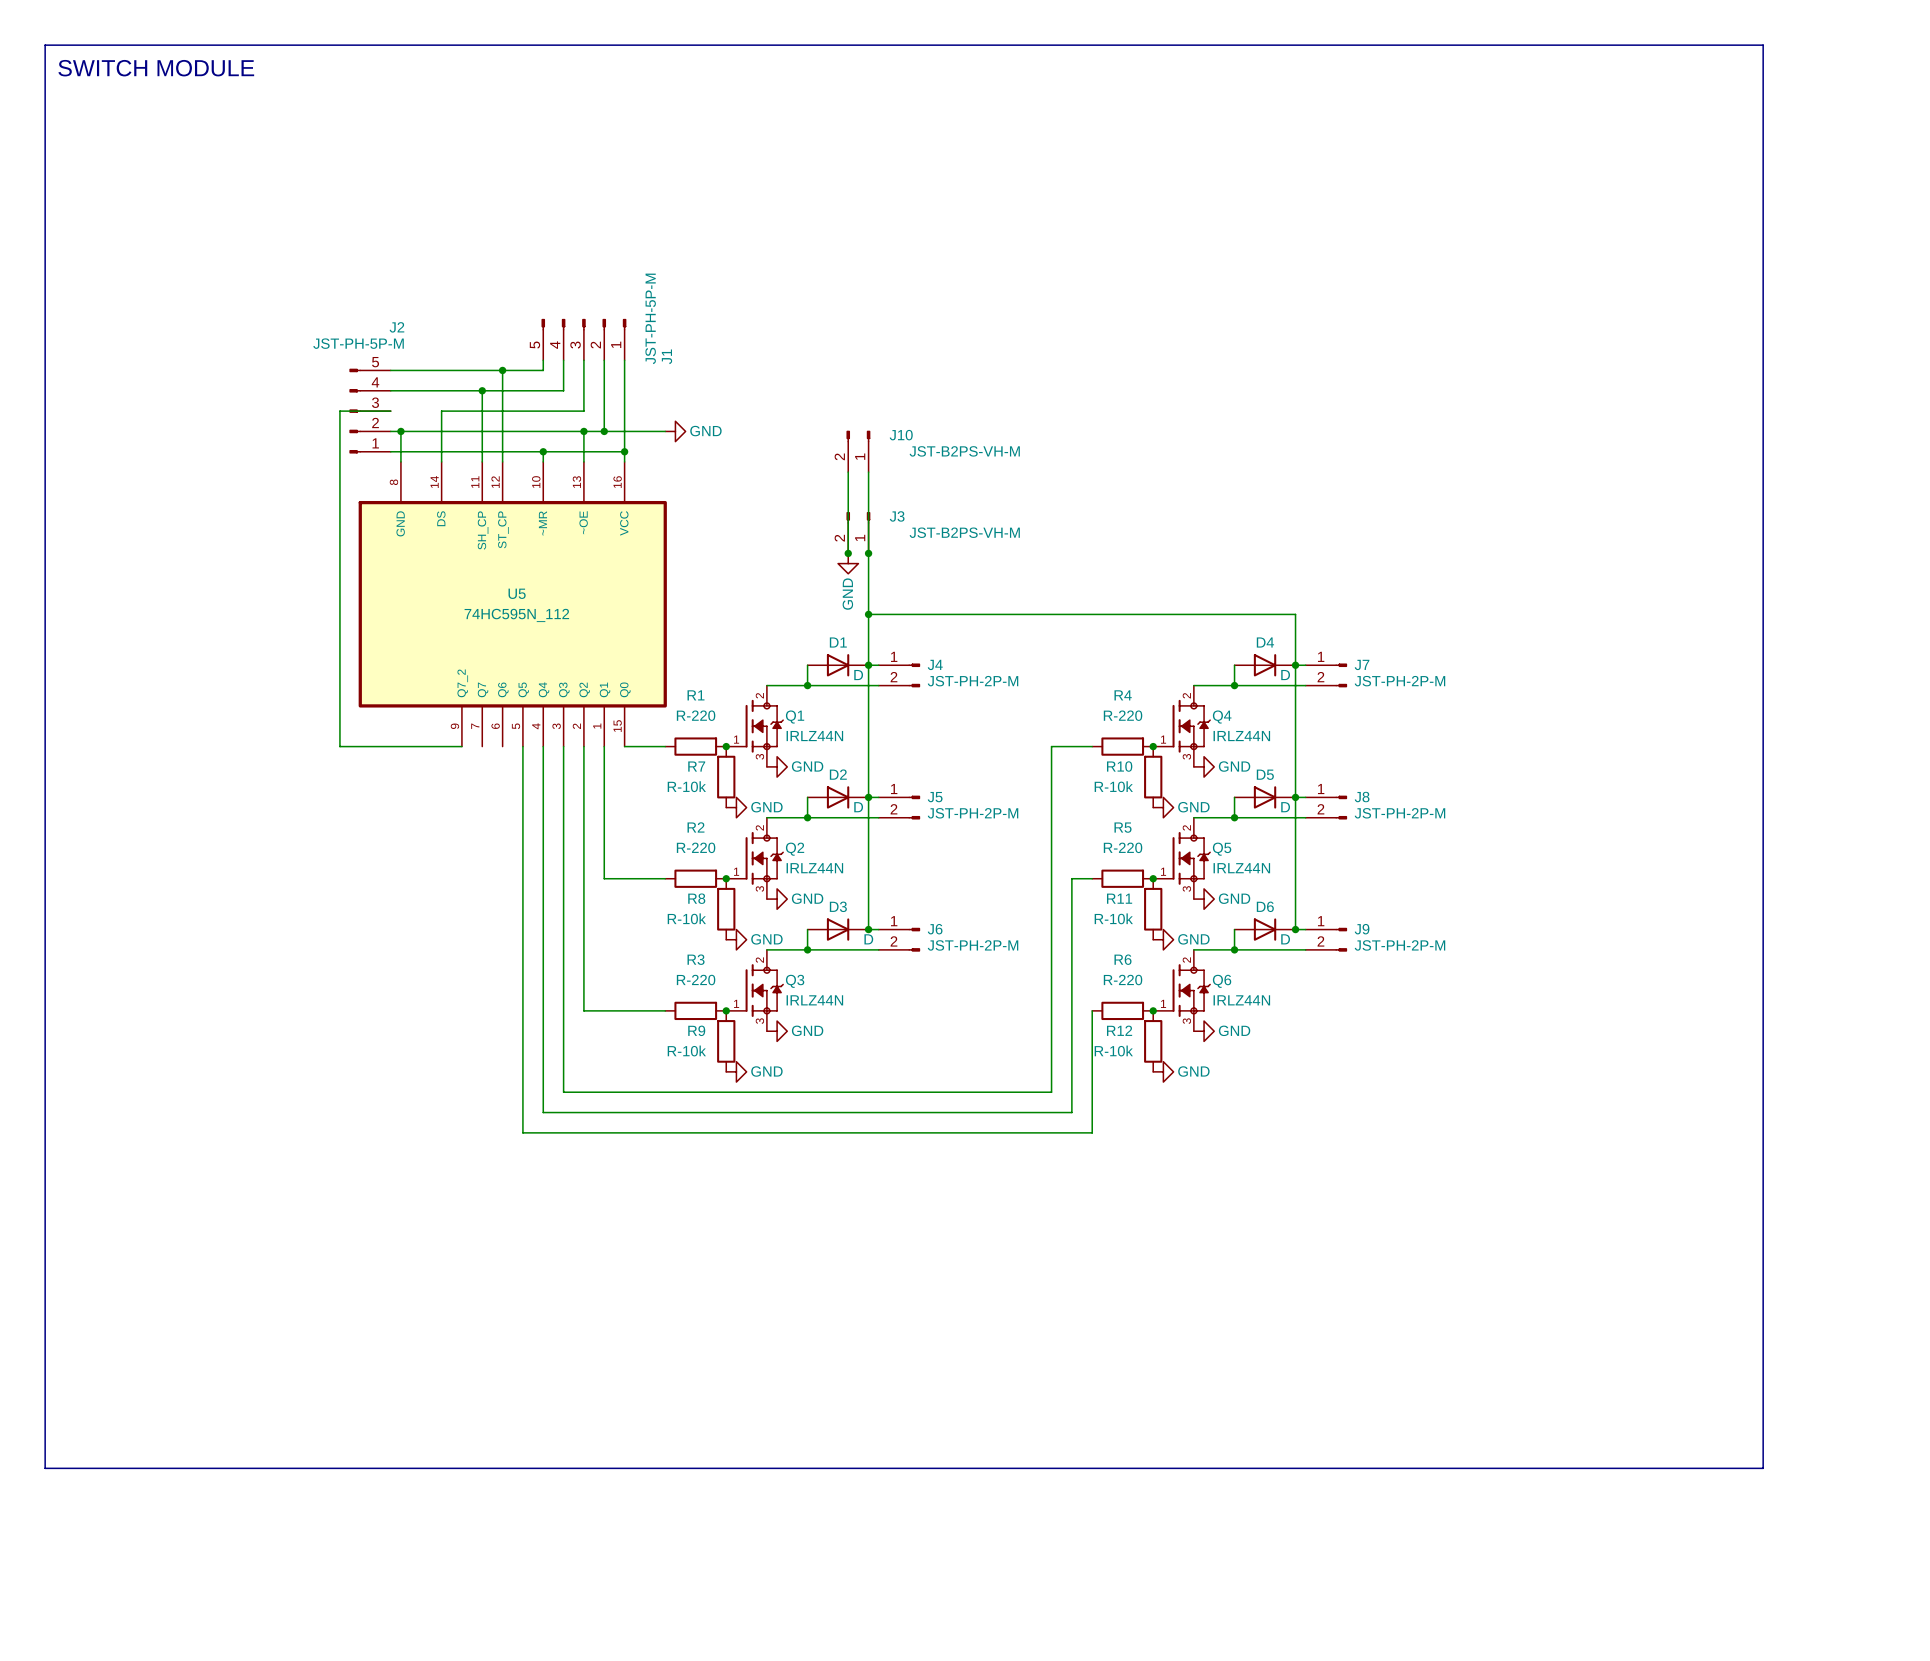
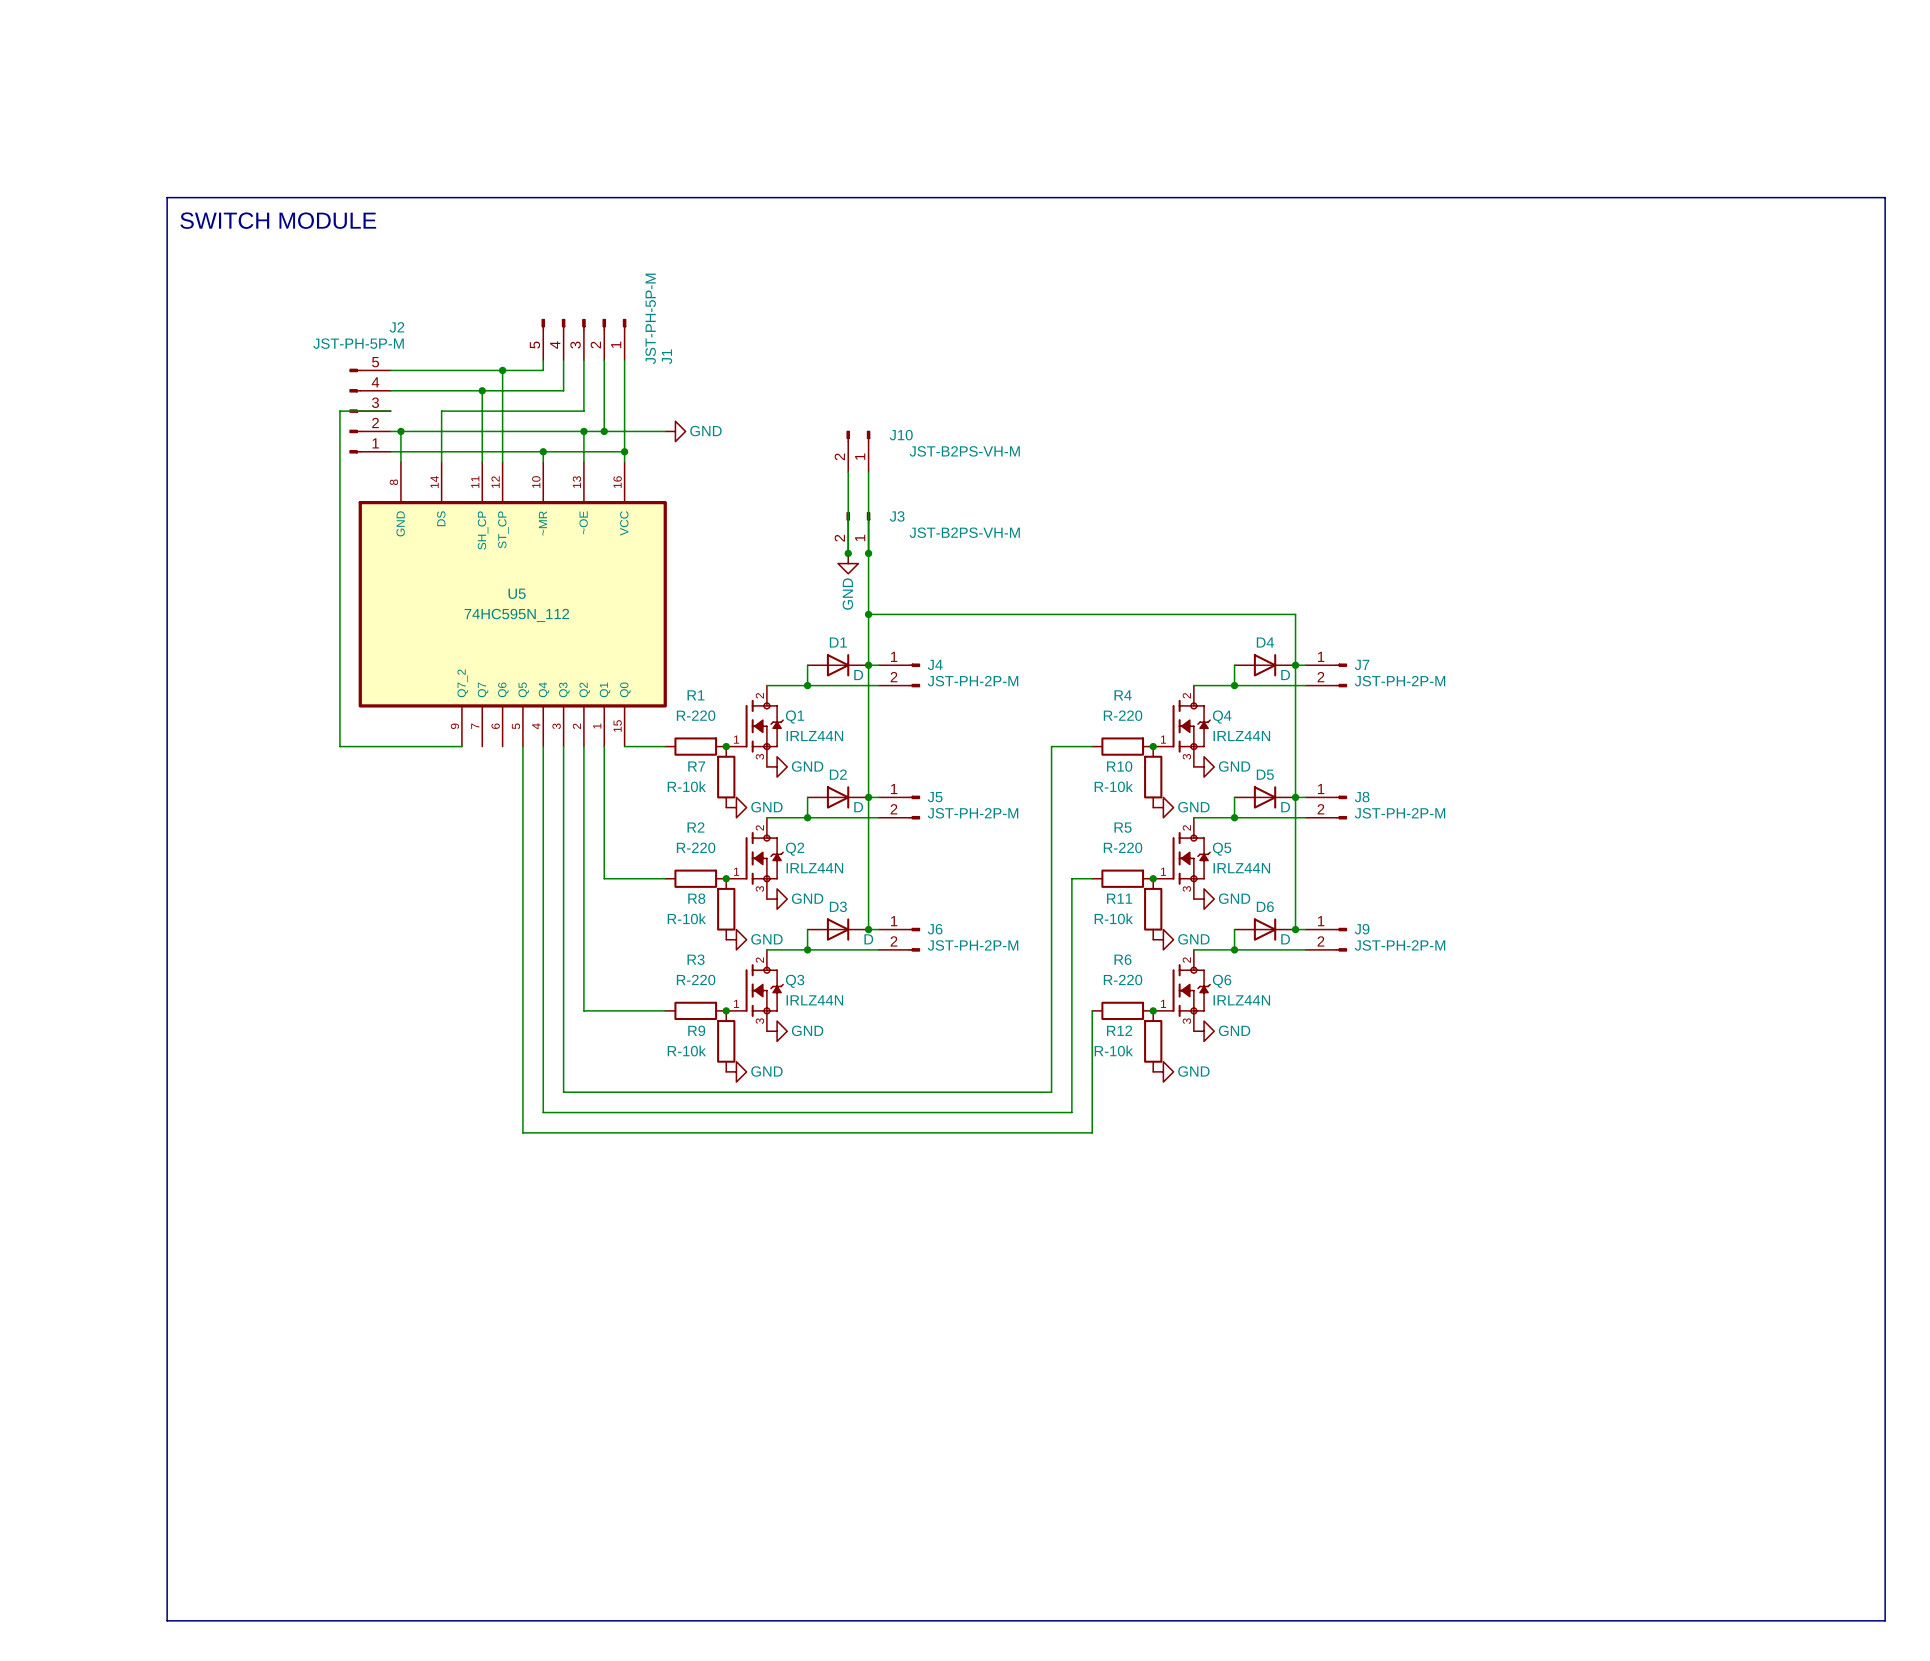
line: (45, 45) (1763, 45) (1763, 1468) (45, 1468) (45, 45) -> (167, 197) (1885, 197) (1885, 1620) (167, 1620) (167, 197)
text position: SWITCH MODULE (156, 68) -> SWITCH MODULE (278, 220)

